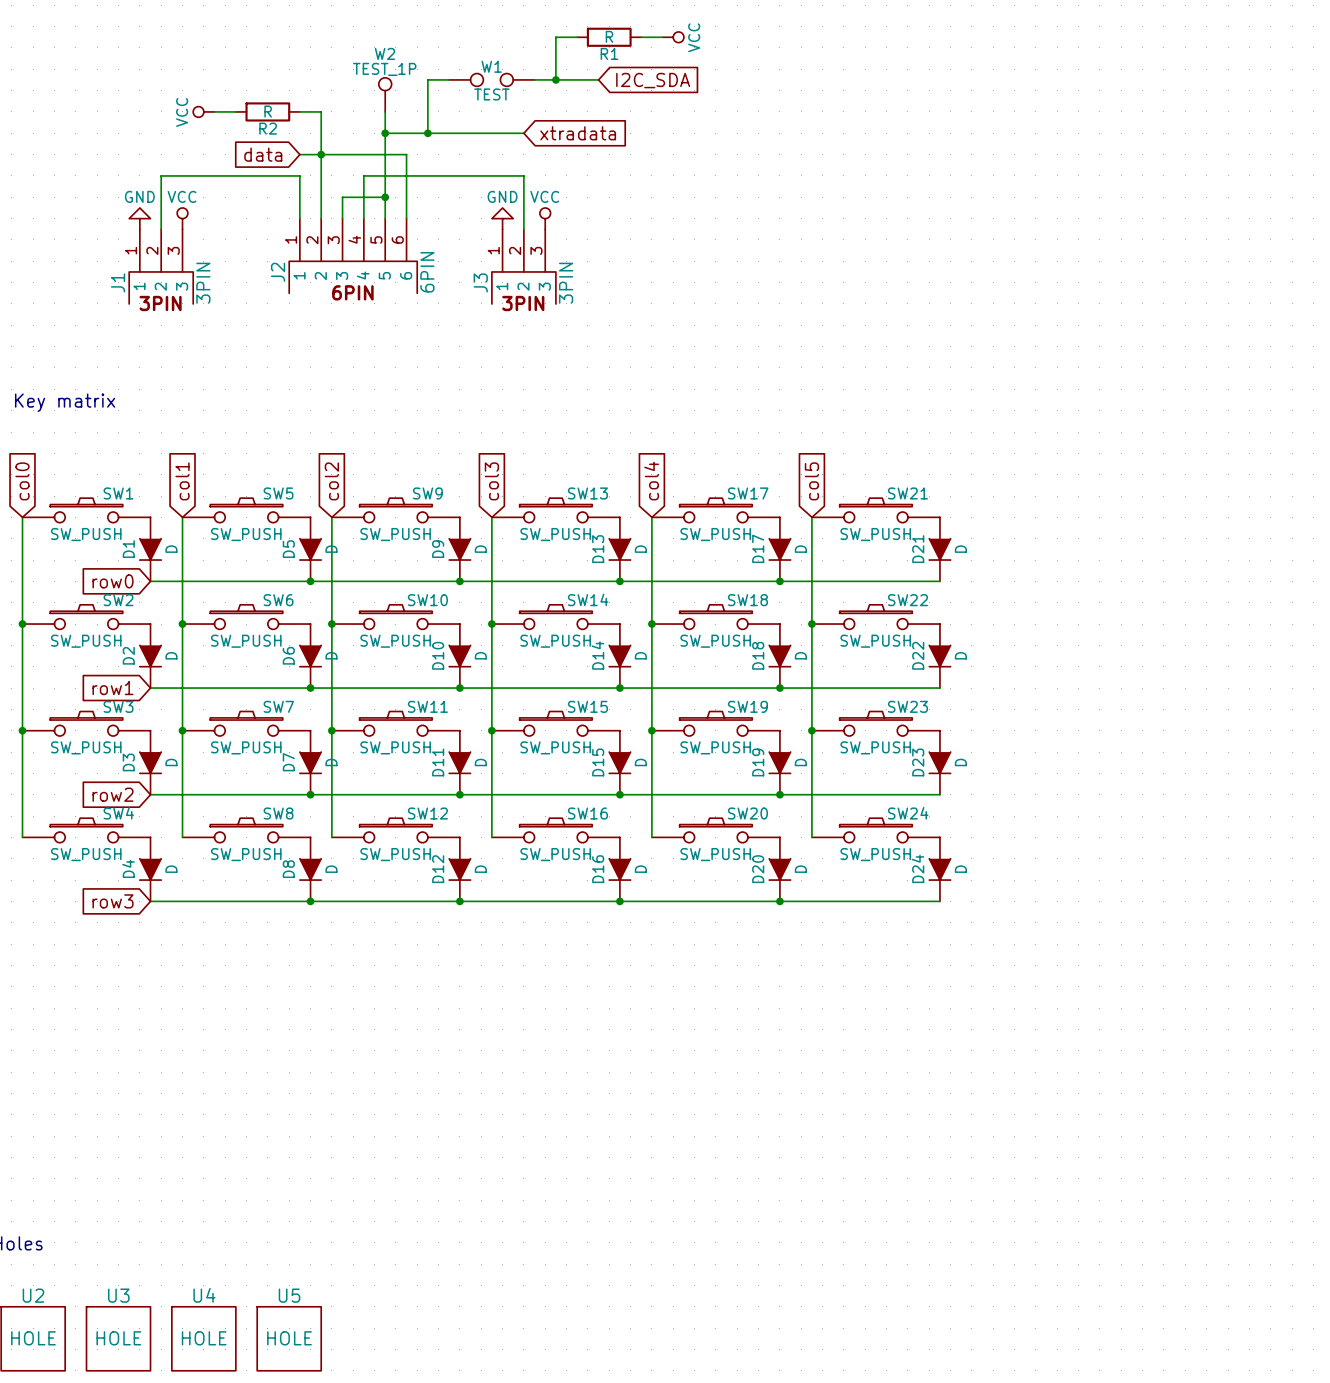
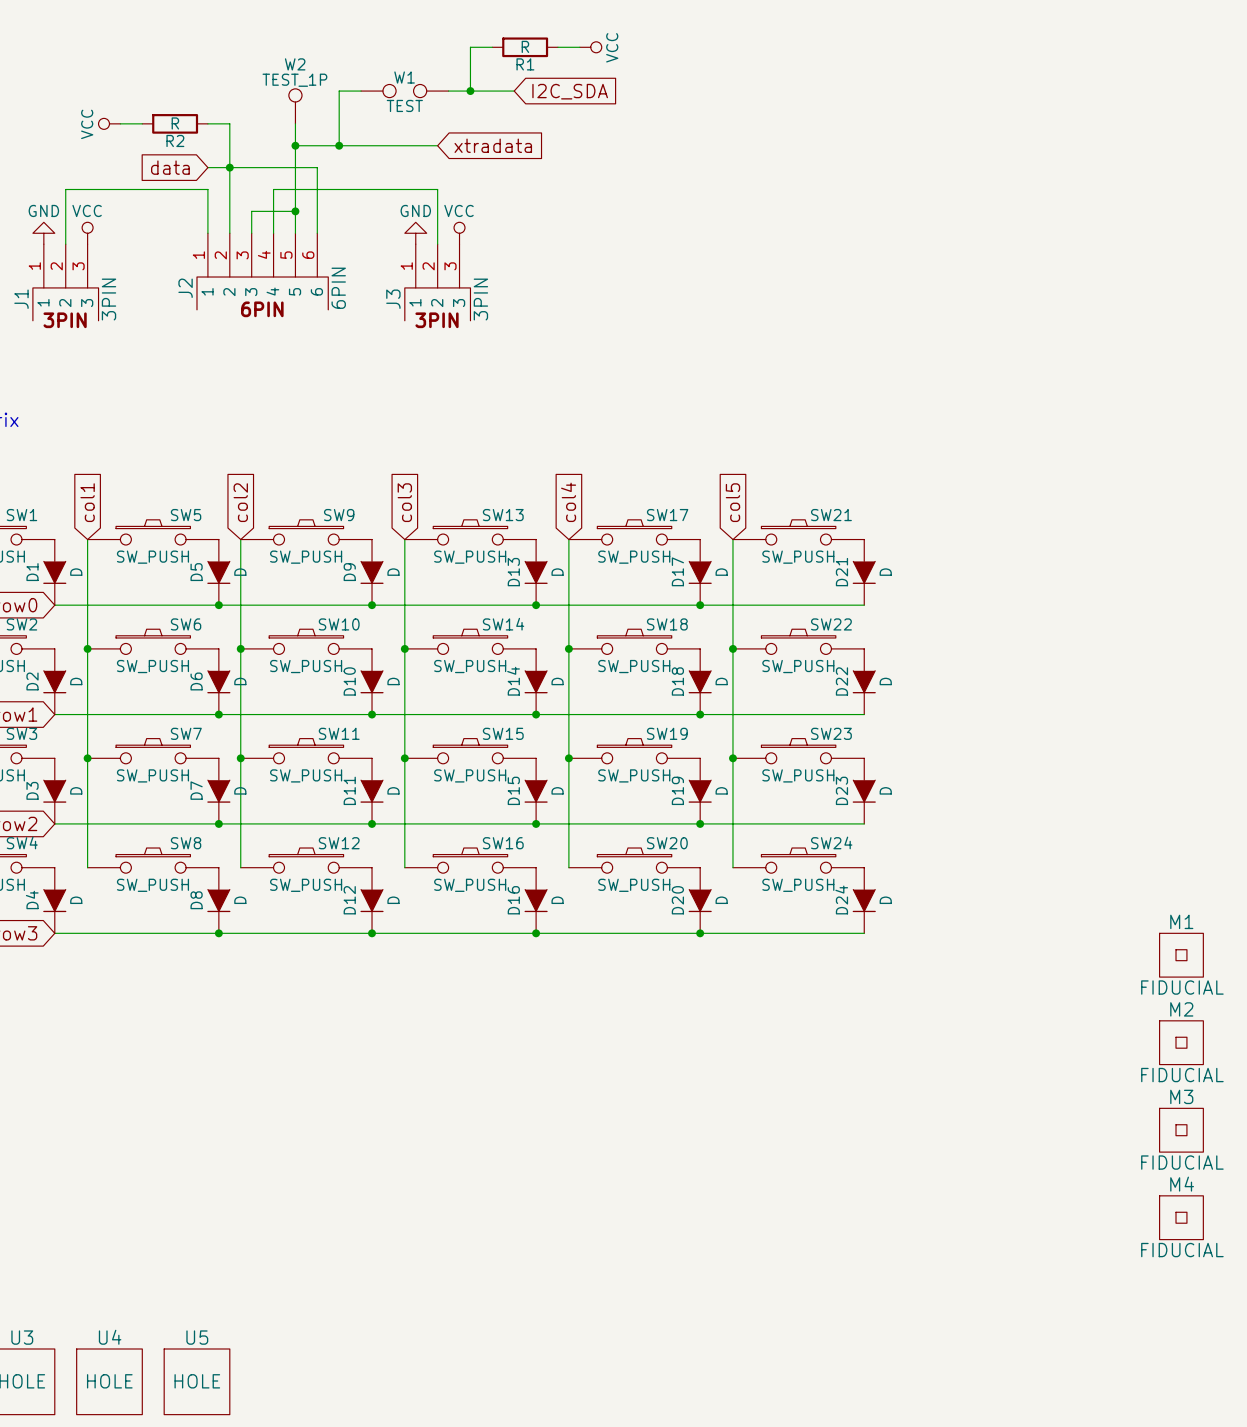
M1: none -> FIDUCIAL (1181, 955)
M2: none -> FIDUCIAL (1181, 1042)
M3: none -> FIDUCIAL (1181, 1130)
M4: none -> FIDUCIAL (1181, 1217)

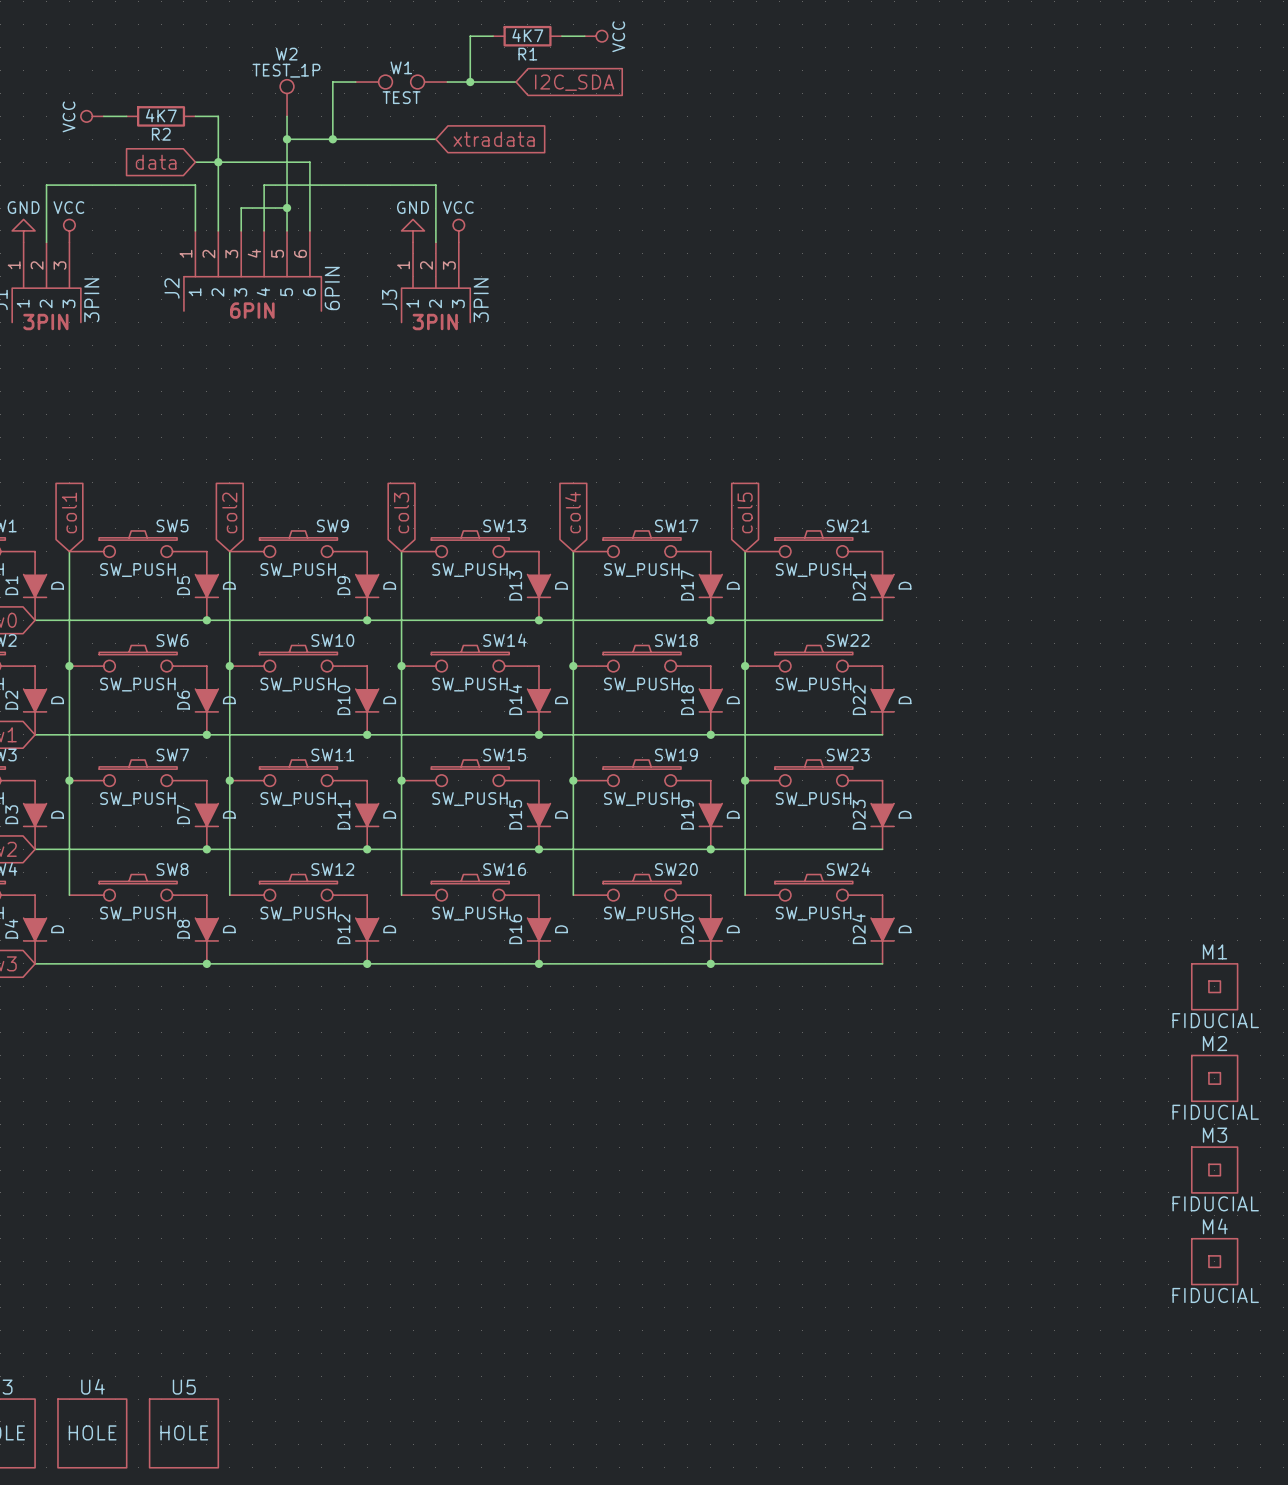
R1 value: R (525, 46) -> 4K7 (527, 35)
R2 value: R (175, 123) -> 4K7 (161, 115)

